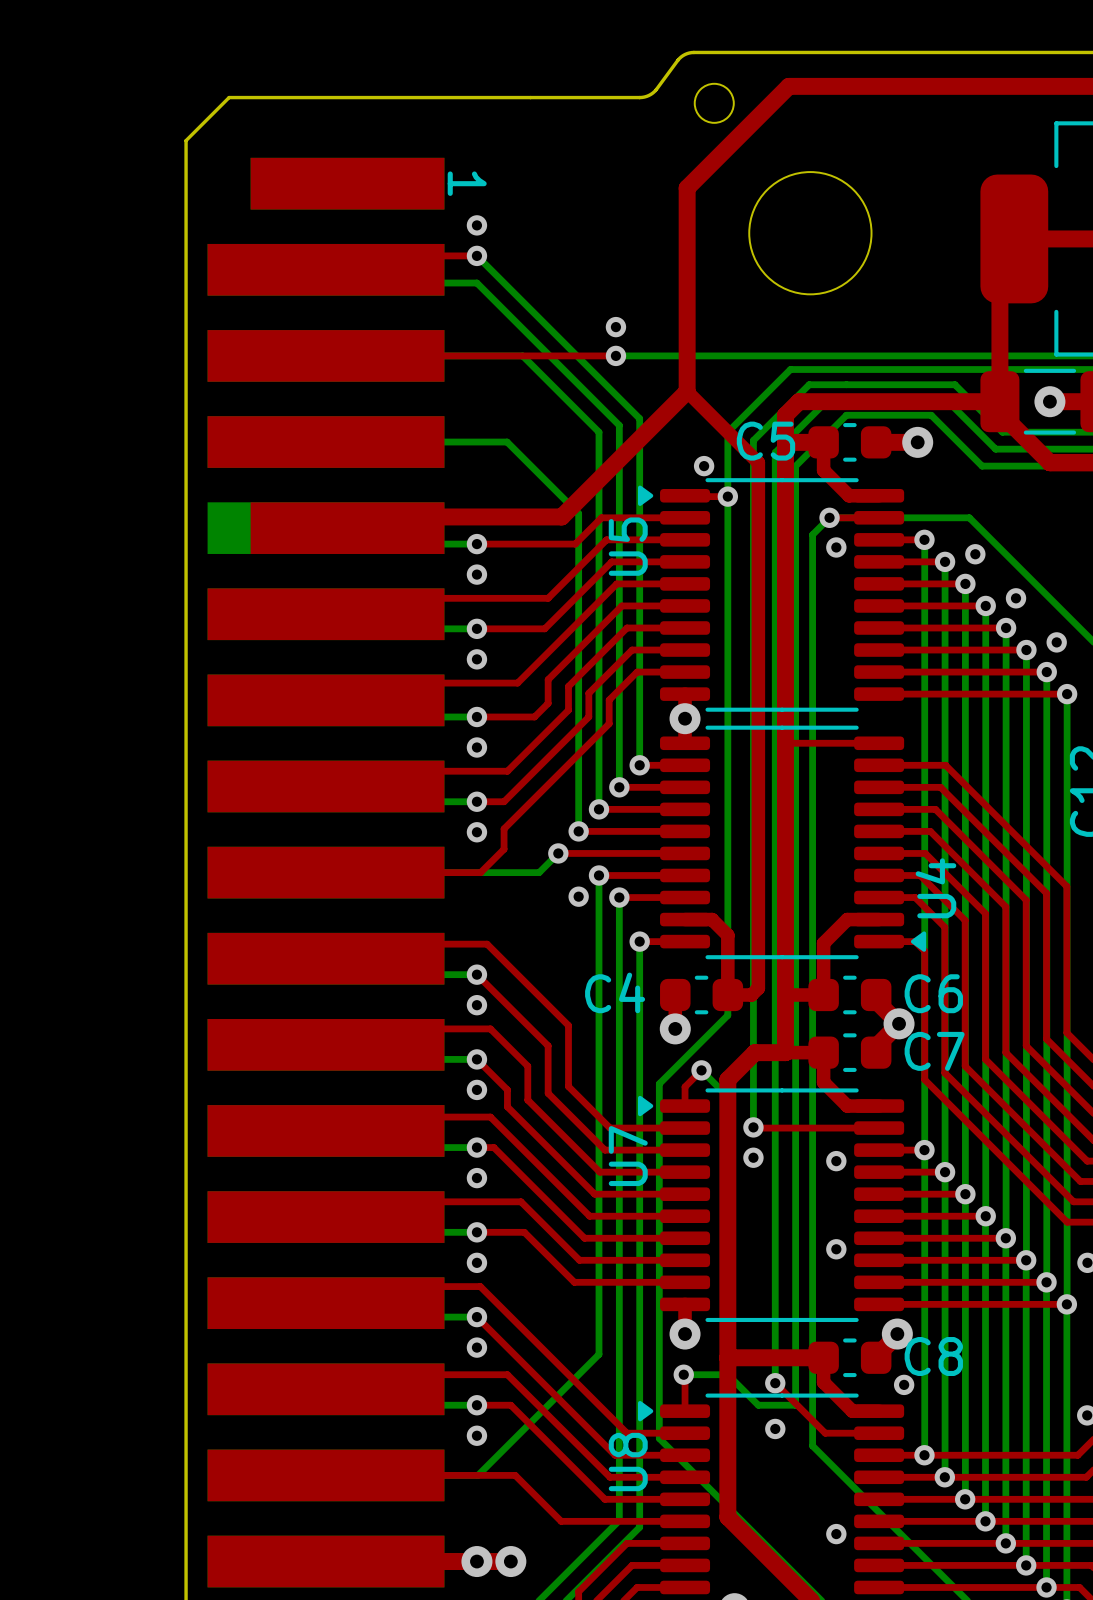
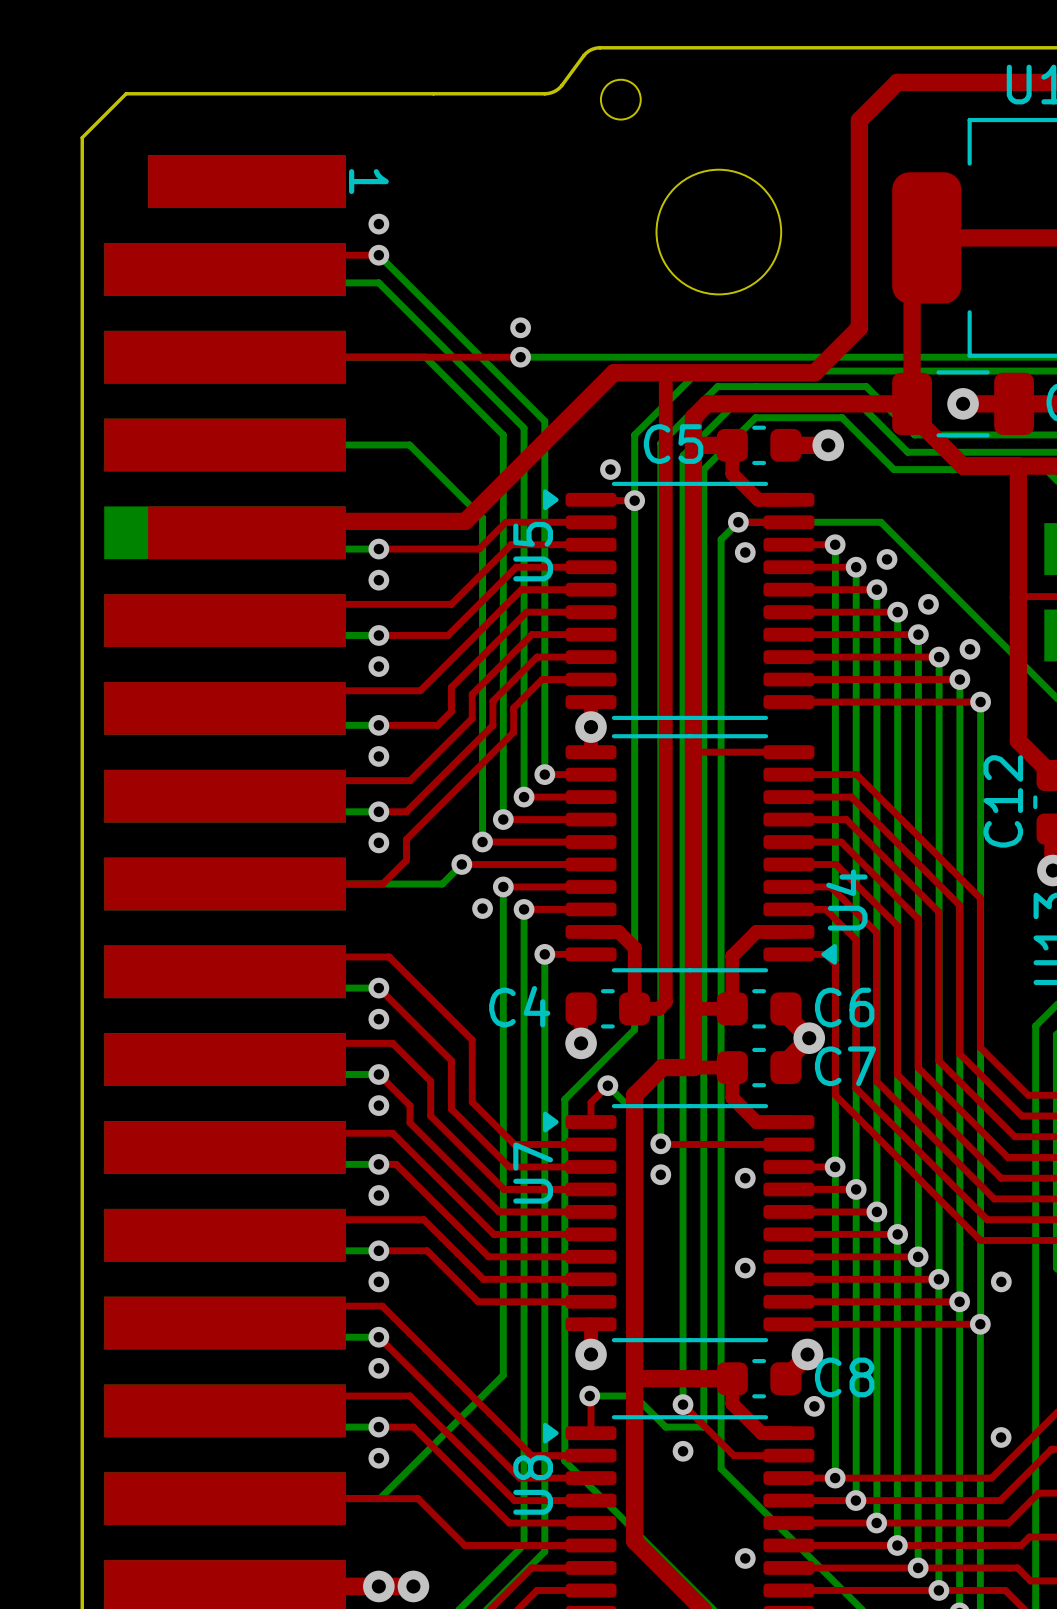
top track: (985, 86) (788, 86) (687, 188) (687, 391) (758, 462) -> (897, 82) (859, 120) (859, 327) (814, 372) (613, 372) (593, 393)
top track: none -> (665, 372) (665, 466)

